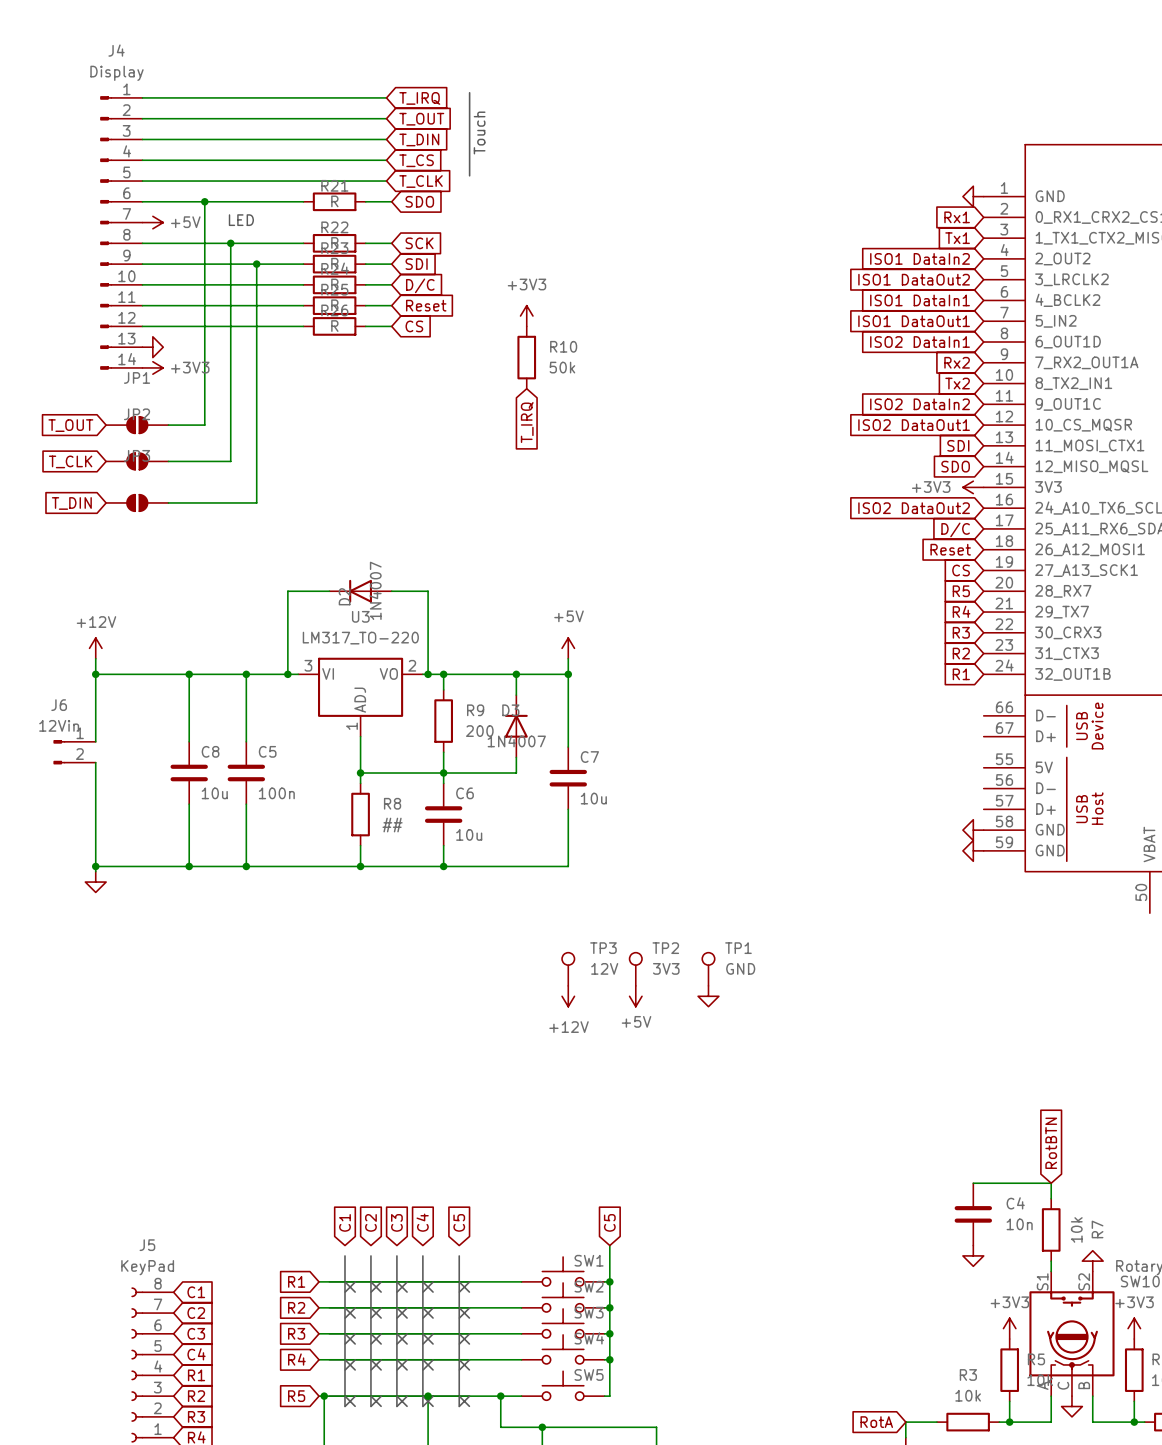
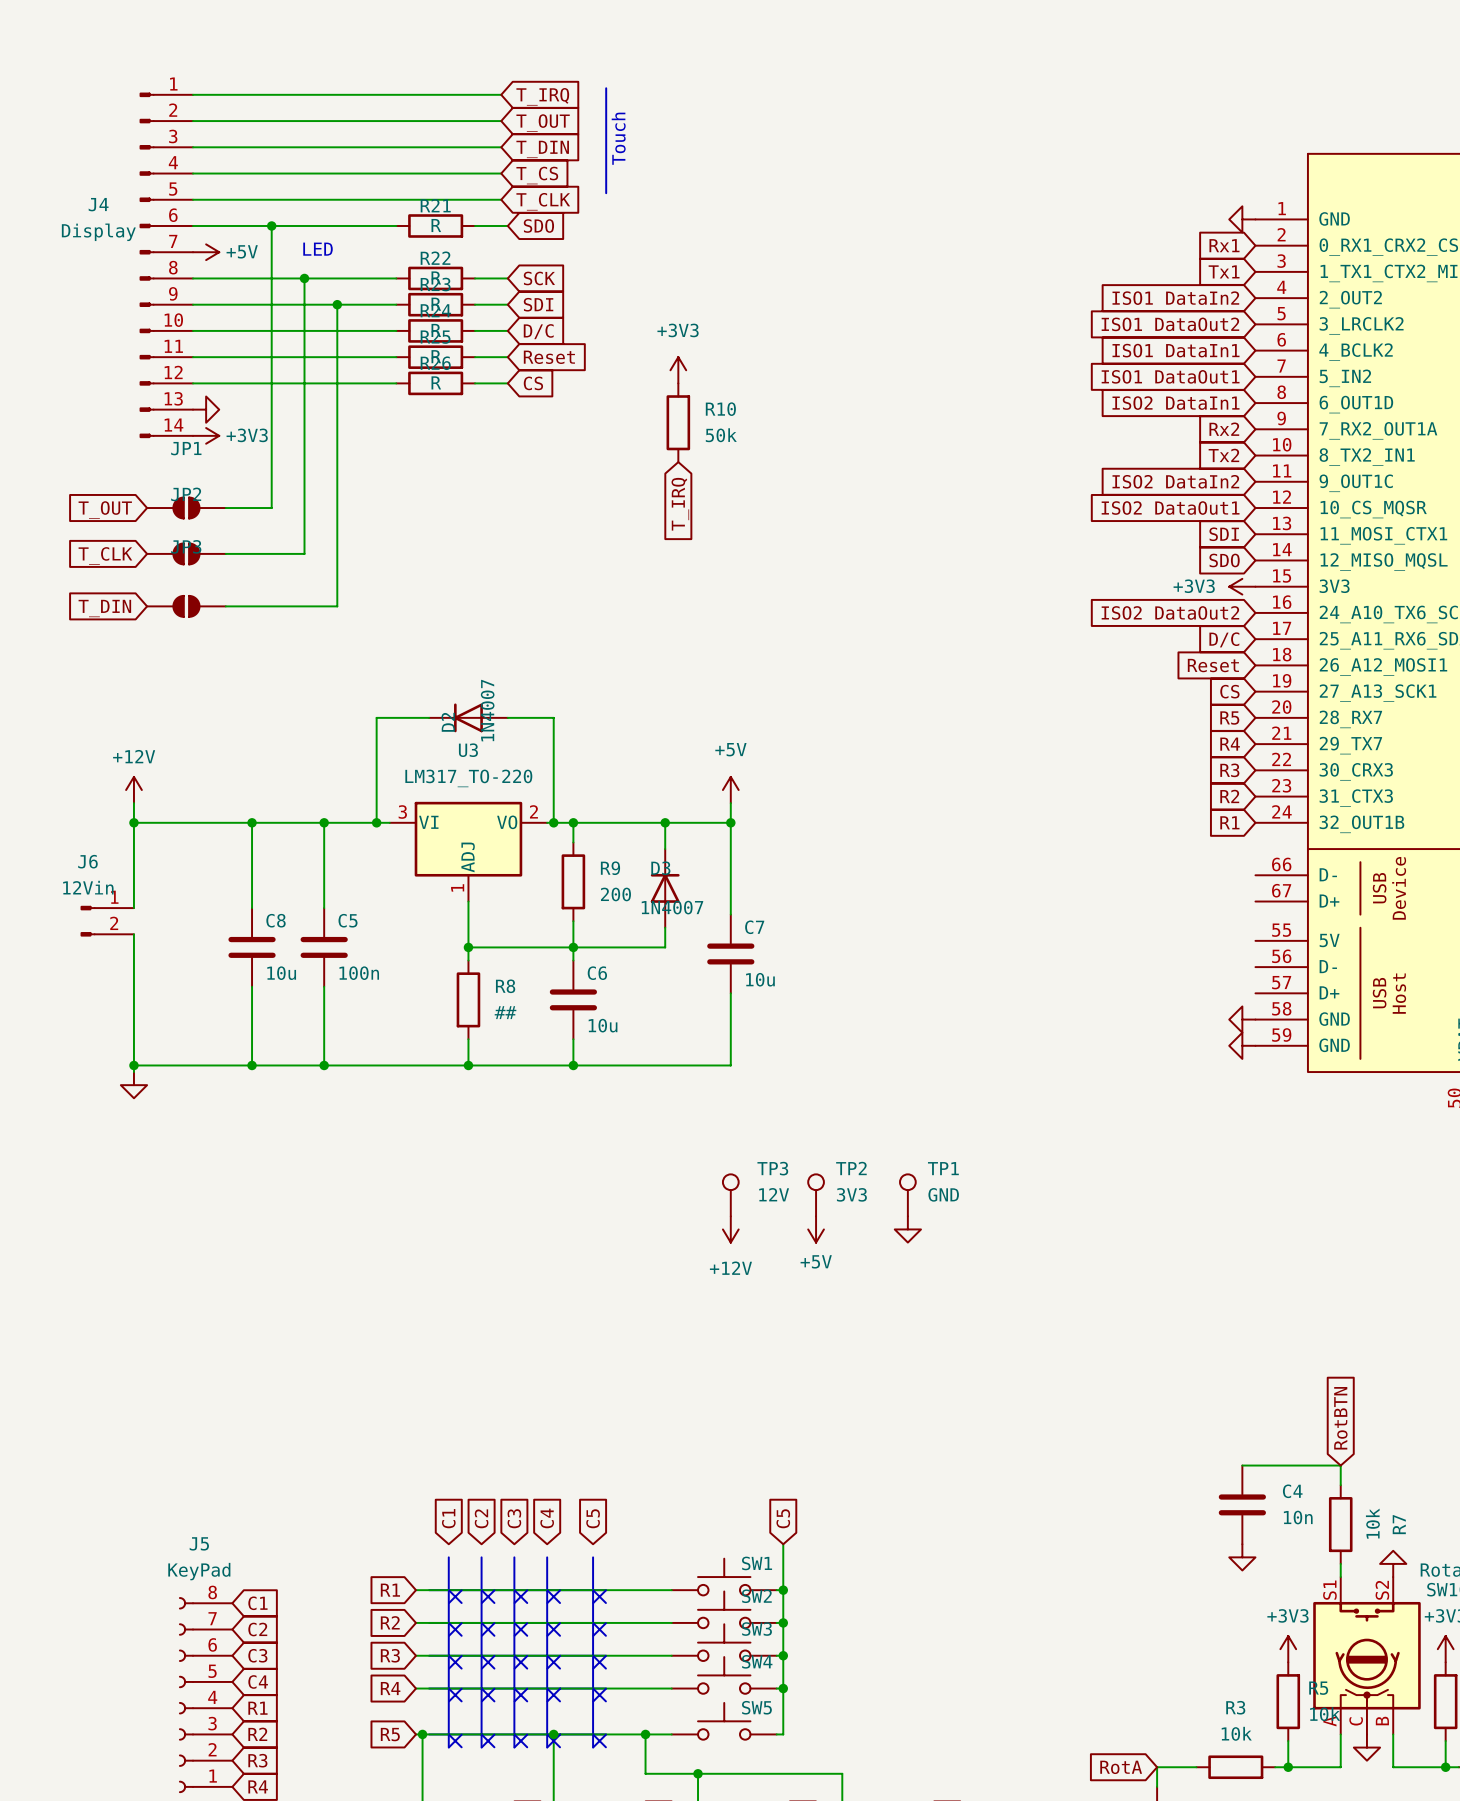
J4 name position: J4 (116, 50) -> J4 (98, 204)
J4 value position: Display (117, 73) -> Display (98, 232)

